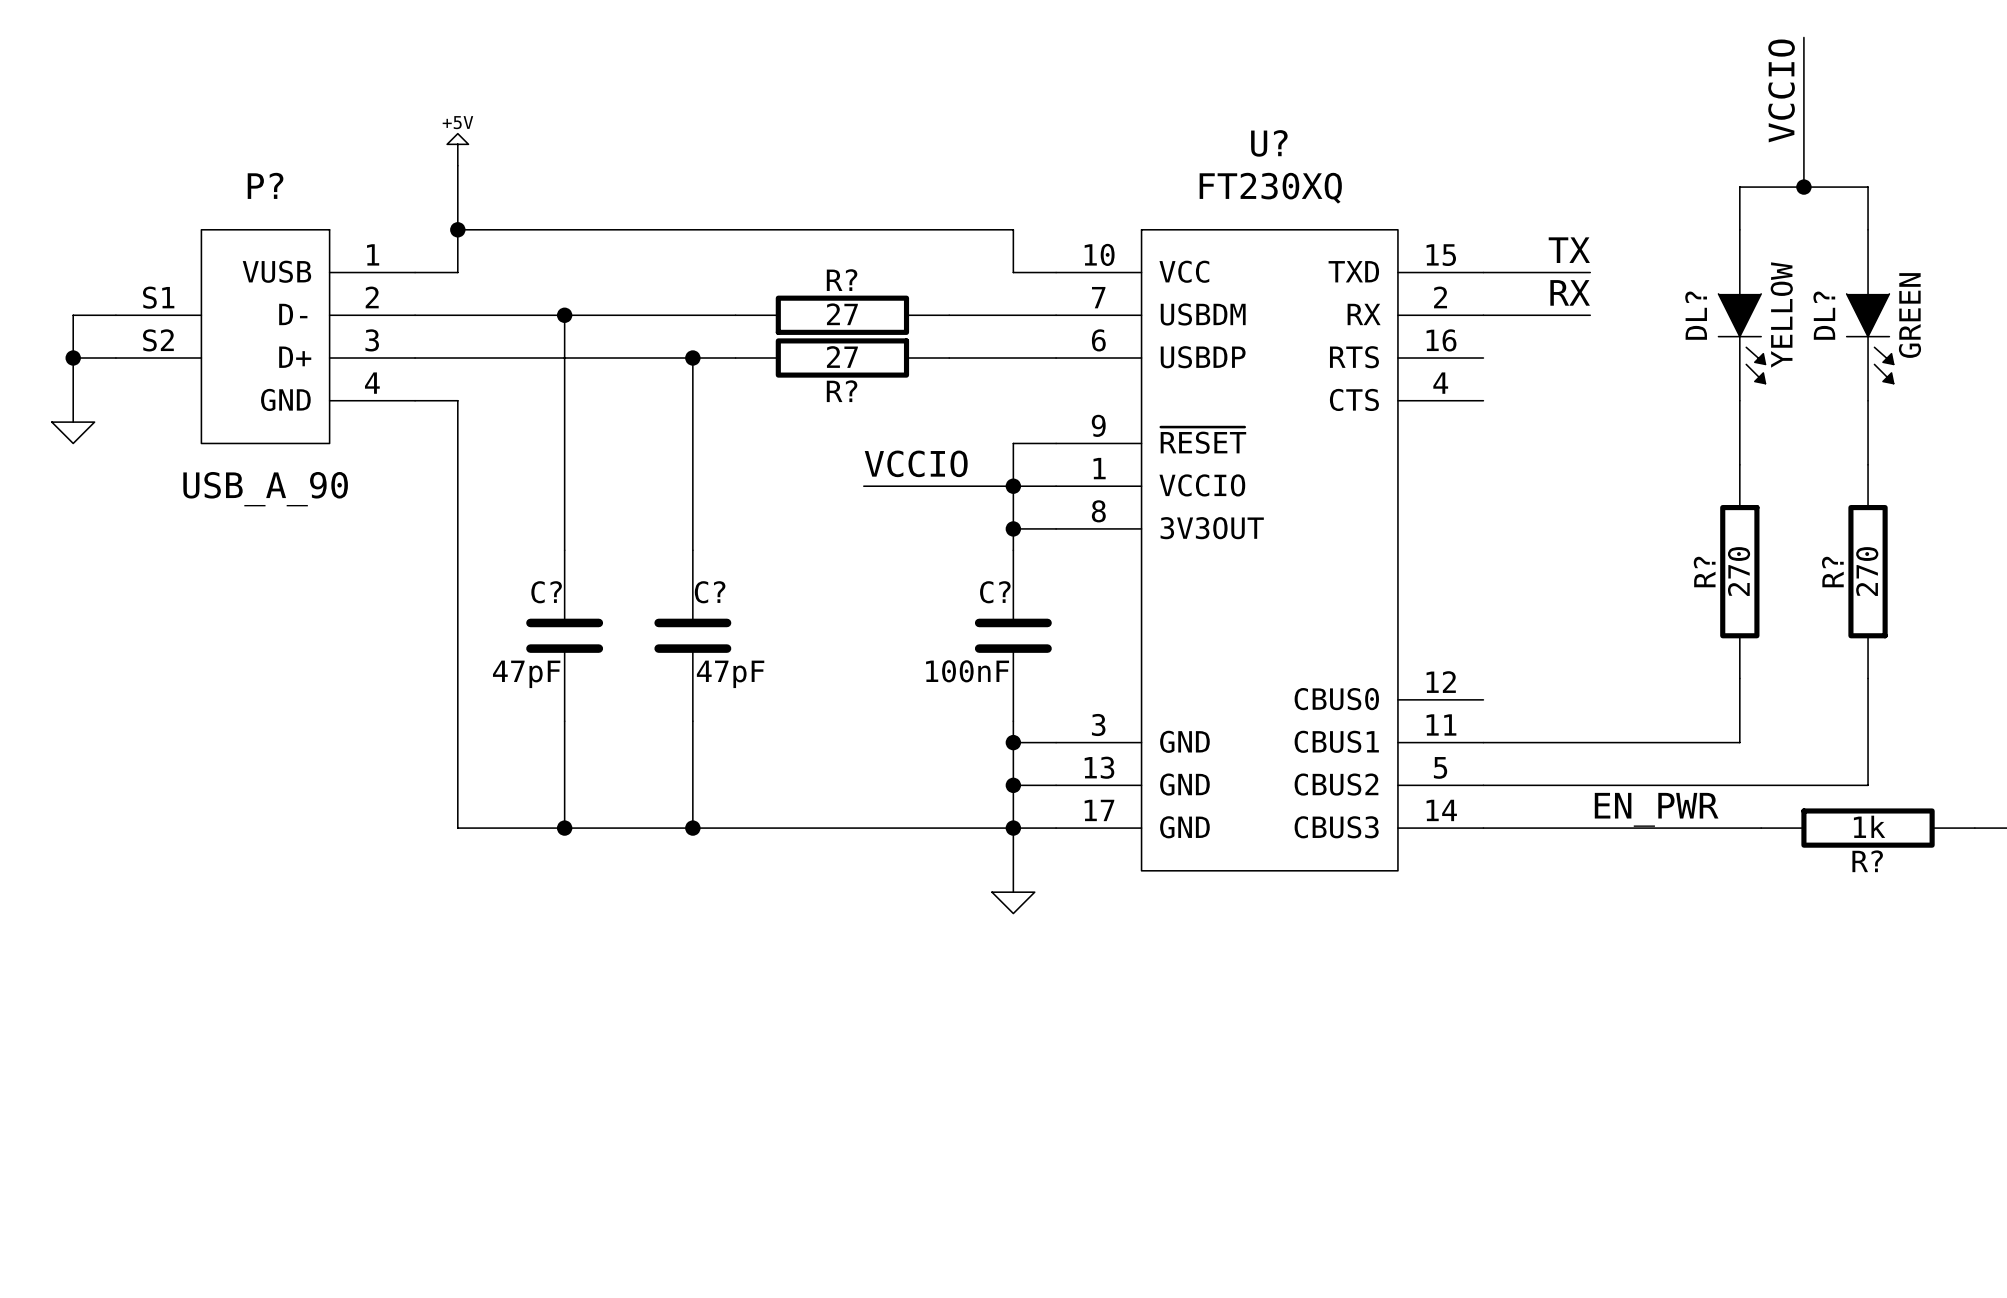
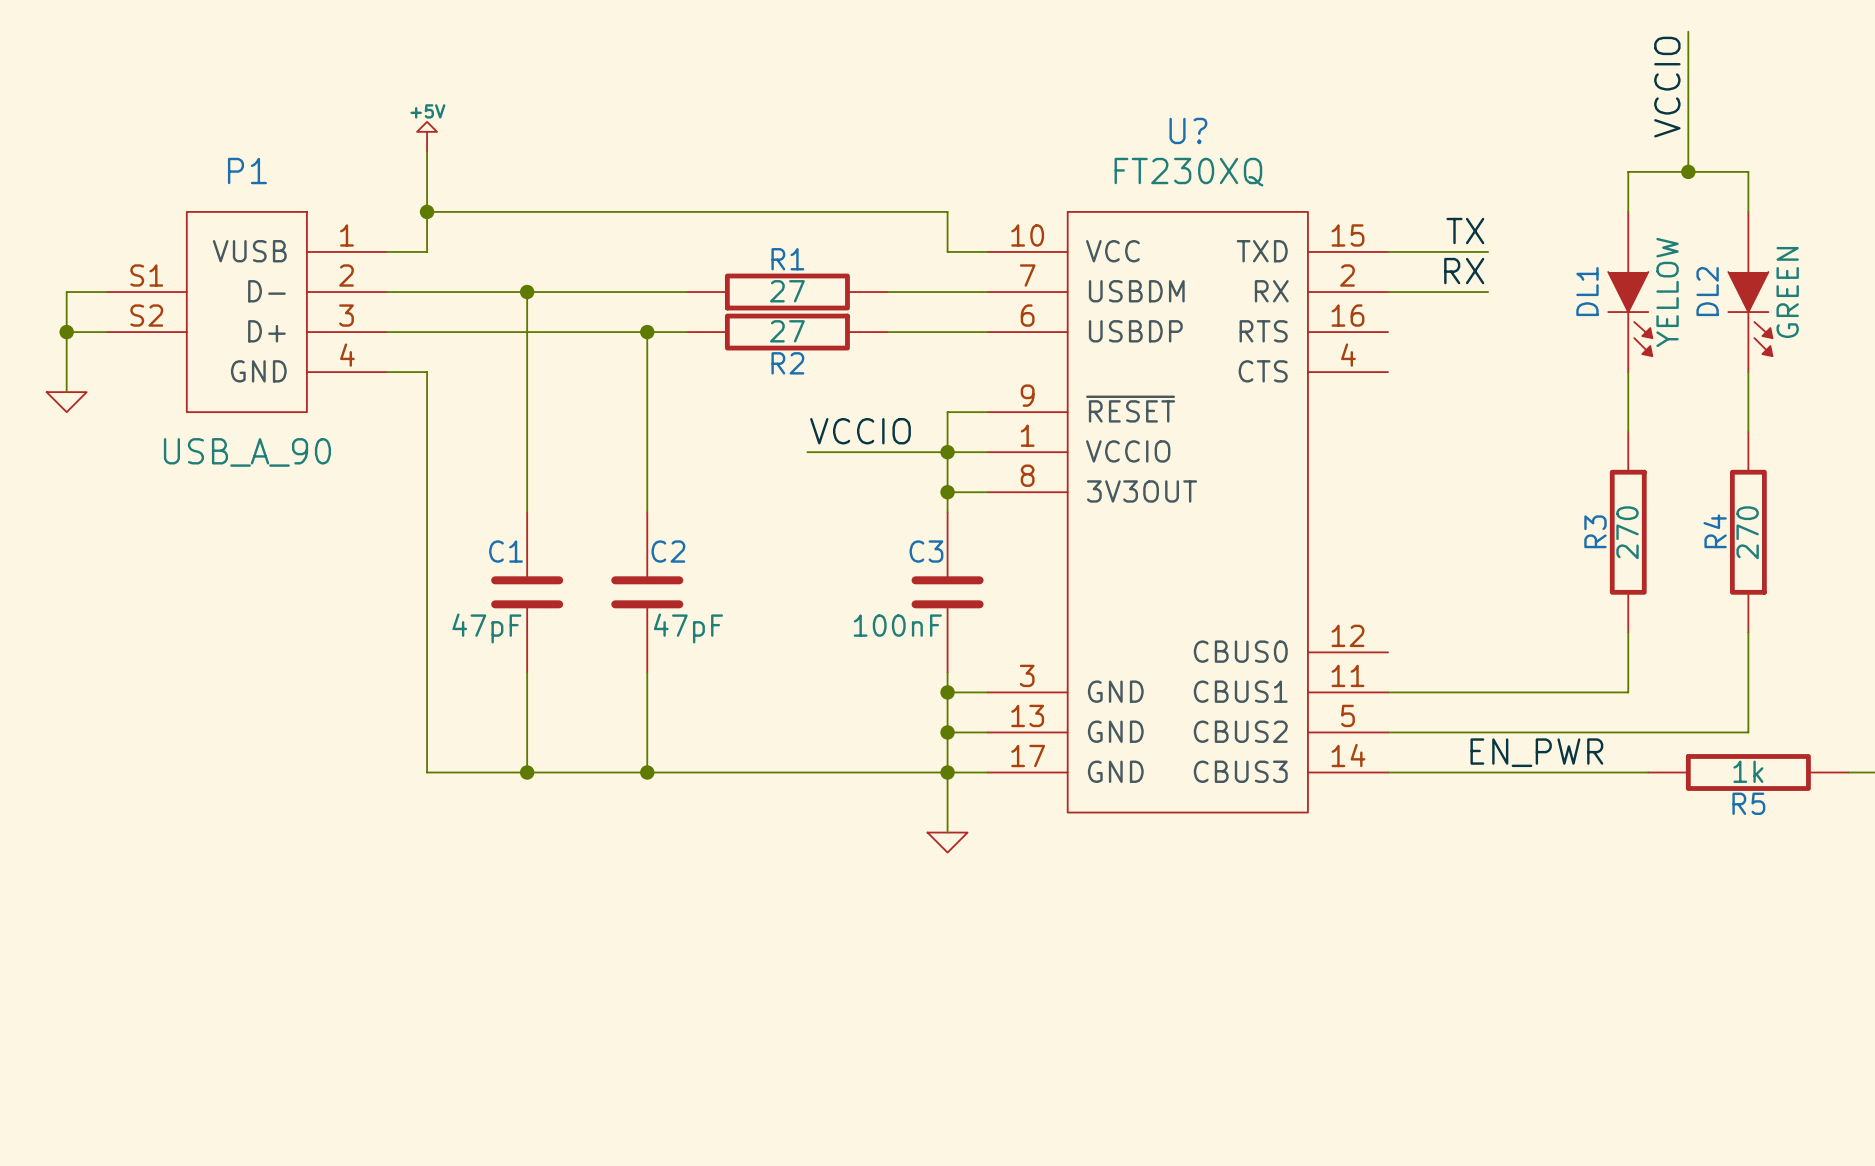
P? name: P? (265, 185) -> P1 (247, 171)
R? name: R? (842, 280) -> R1 (787, 259)
DL? name: DL? (1696, 315) -> DL1 (1587, 291)
DL? name: DL? (1824, 315) -> DL2 (1707, 291)
R? name: R? (842, 391) -> R2 (787, 363)
R? name: R? (1704, 572) -> R3 (1595, 531)
R? name: R? (1832, 572) -> R4 (1715, 531)
C? name: C? (546, 592) -> C1 (506, 551)
C? name: C? (710, 592) -> C2 (668, 551)
C? name: C? (995, 592) -> C3 (926, 551)
R? name: R? (1867, 861) -> R5 (1748, 803)

